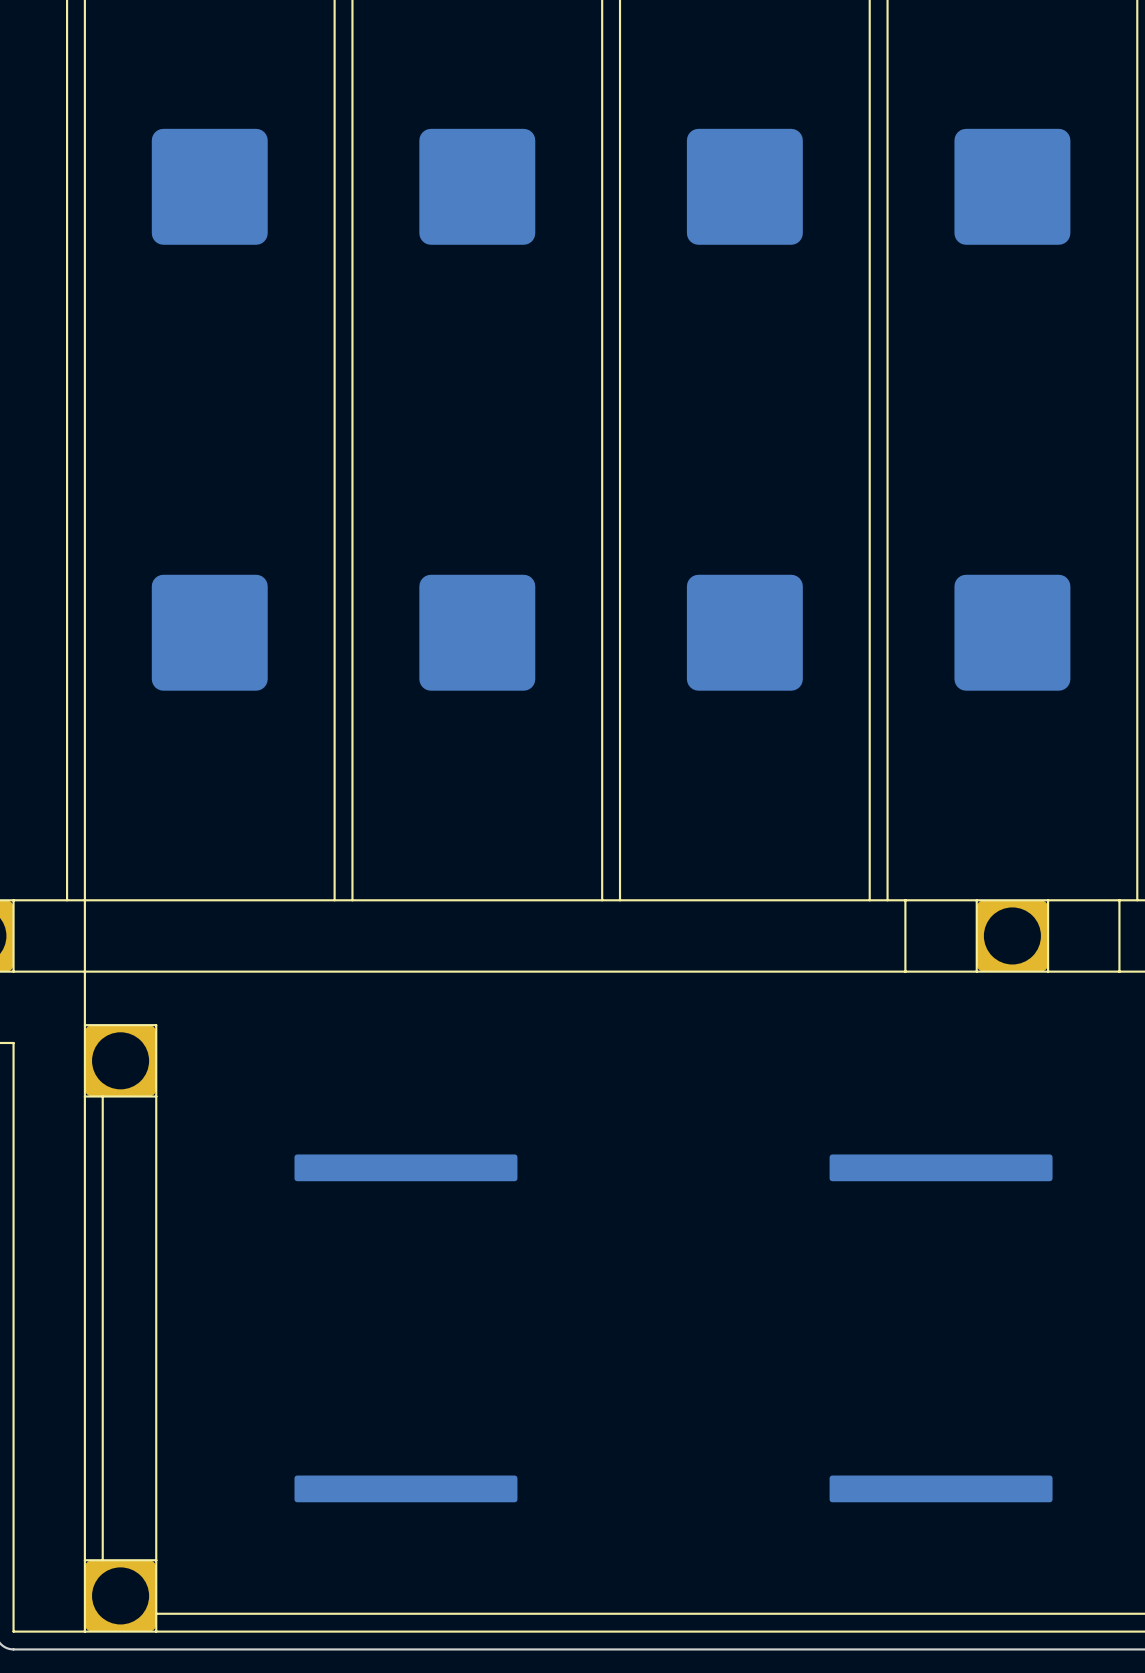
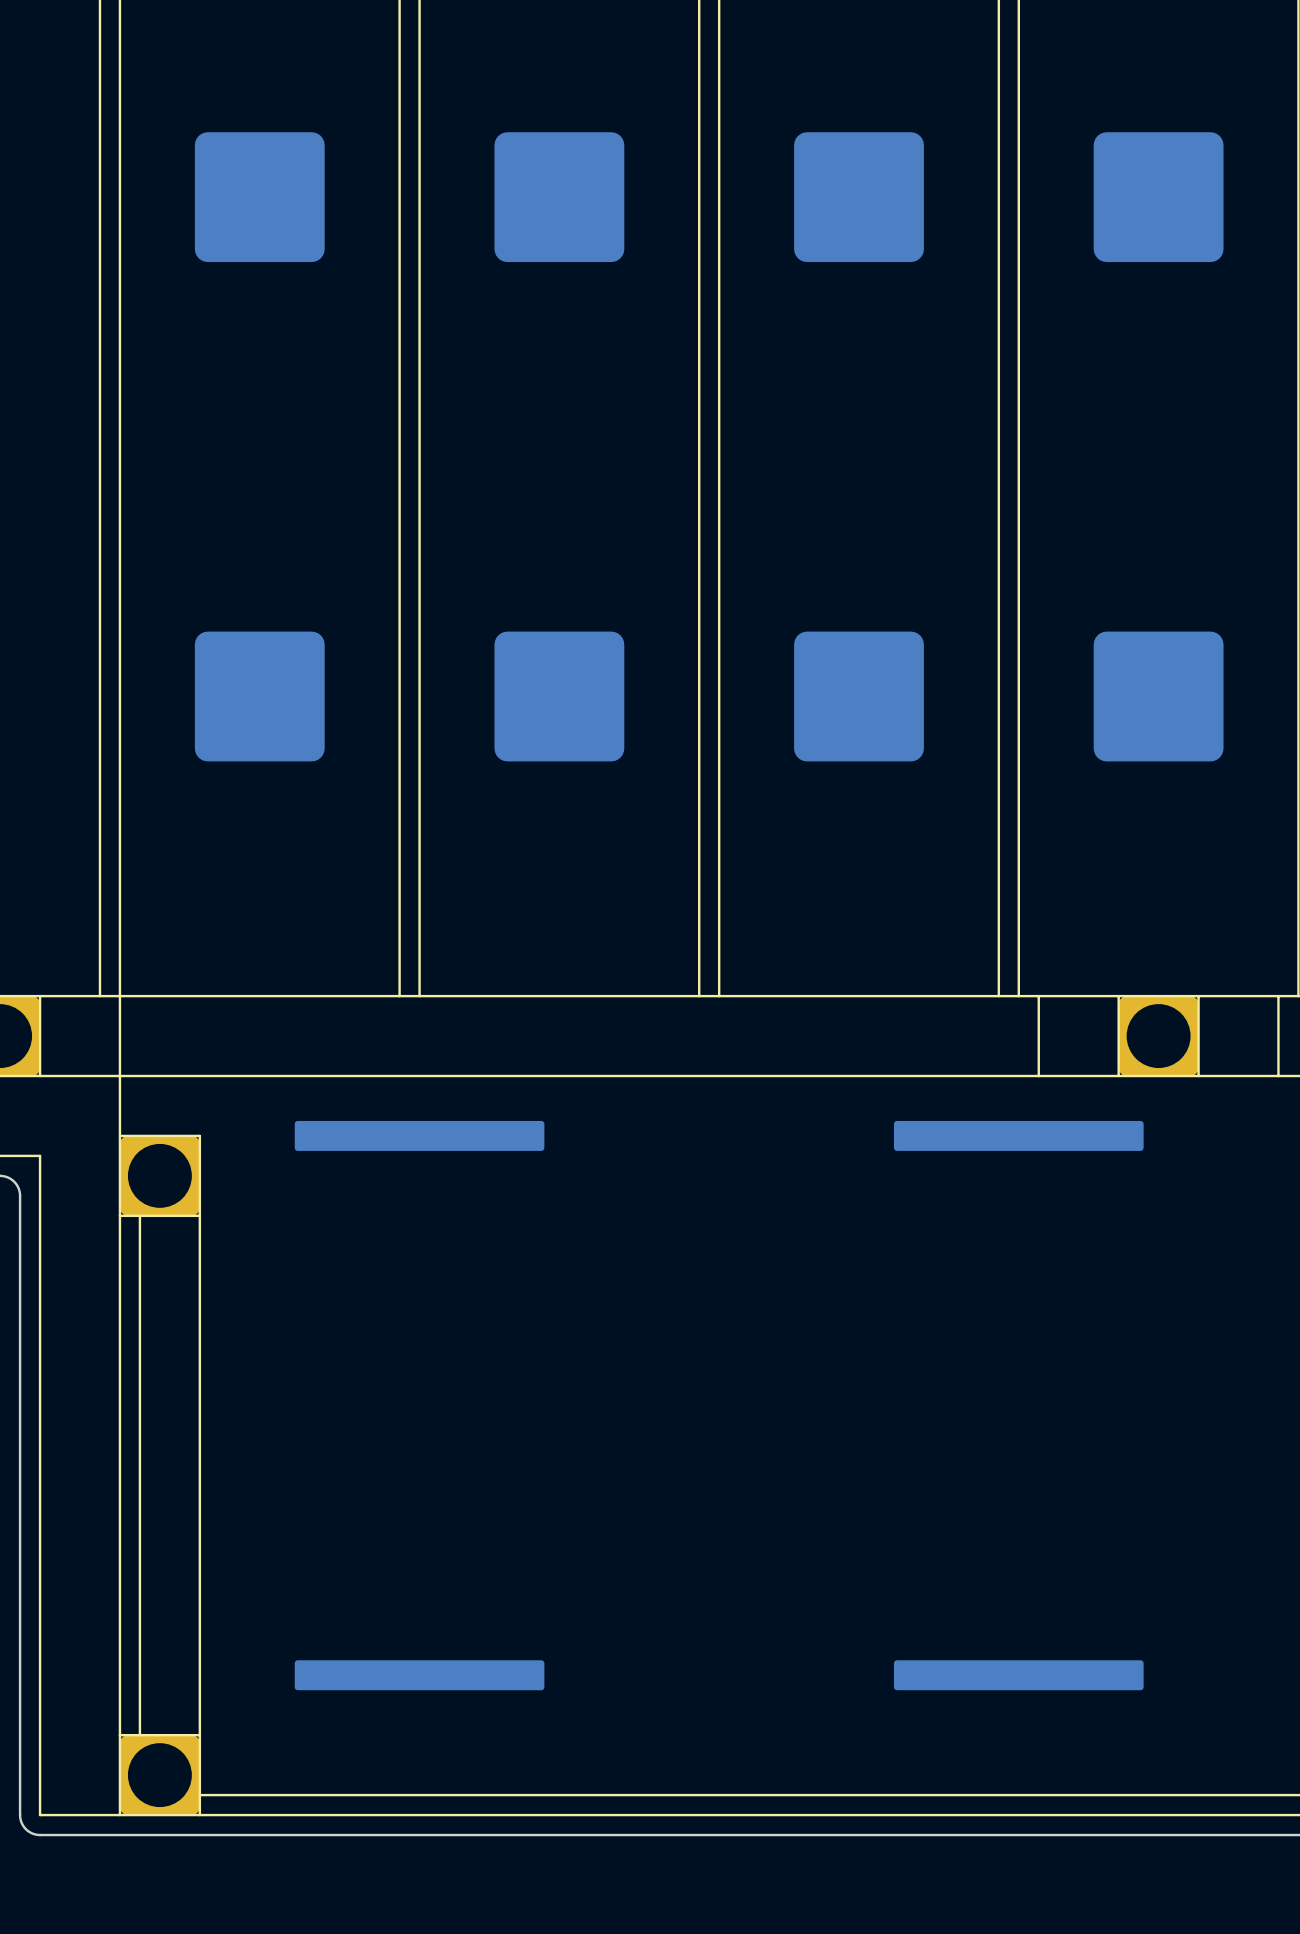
part position: (405, 1167) -> (419, 1135)
part position: (941, 1167) -> (1018, 1135)
part position: (405, 1488) -> (419, 1675)
part position: (941, 1488) -> (1018, 1675)

